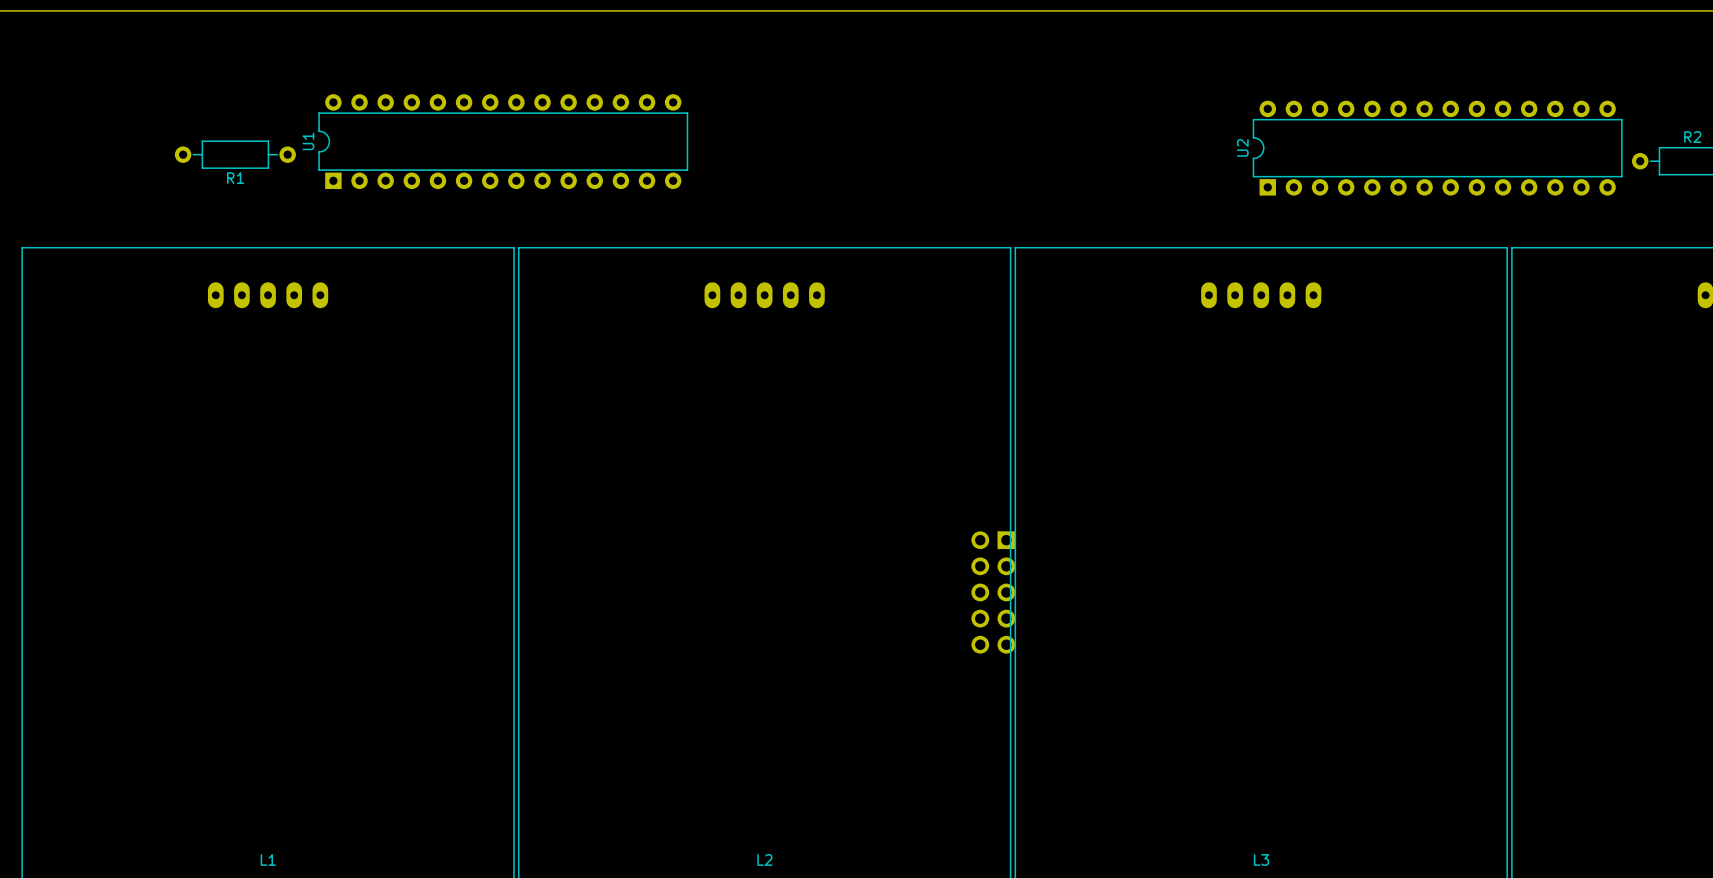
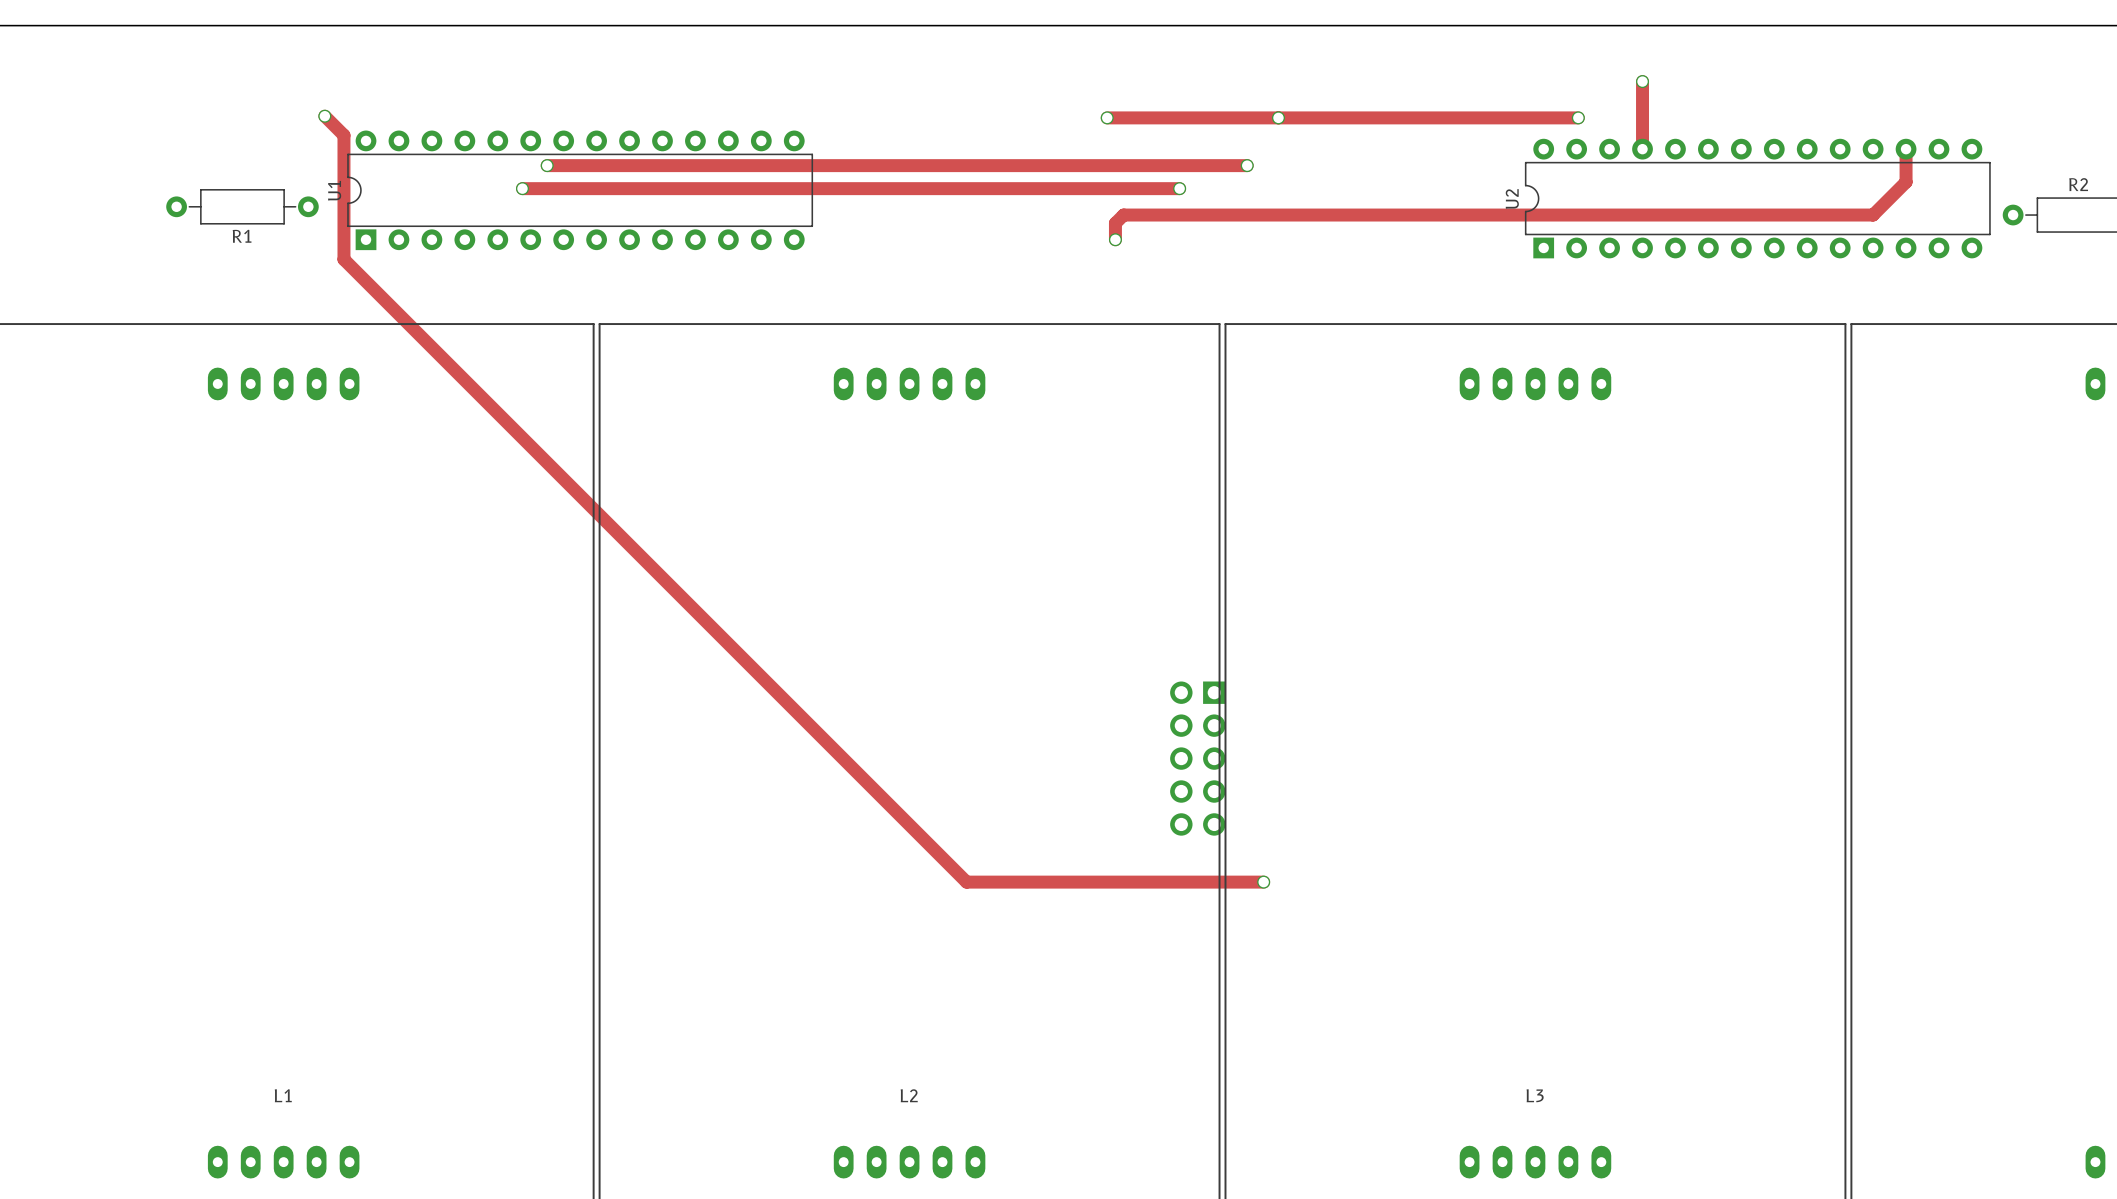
track: none -> (1642, 81) (1642, 149)
via: none -> (1642, 81)
track: none -> (324, 116) (343, 135) (343, 259) (966, 882) (1263, 882)
via: none -> (324, 116)
track: none -> (1107, 117) (1578, 117)
via: none -> (1107, 117)
via: none -> (1278, 117)
via: none -> (1578, 117)
track: none -> (1906, 149) (1906, 182) (1873, 215) (1123, 215) (1115, 223) (1115, 239)
track: none -> (547, 165) (1247, 165)
via: none -> (547, 165)
via: none -> (1247, 165)
track: none -> (522, 188) (1179, 188)
via: none -> (522, 188)
via: none -> (1179, 188)
via: none -> (1115, 239)
via: none -> (1263, 882)

